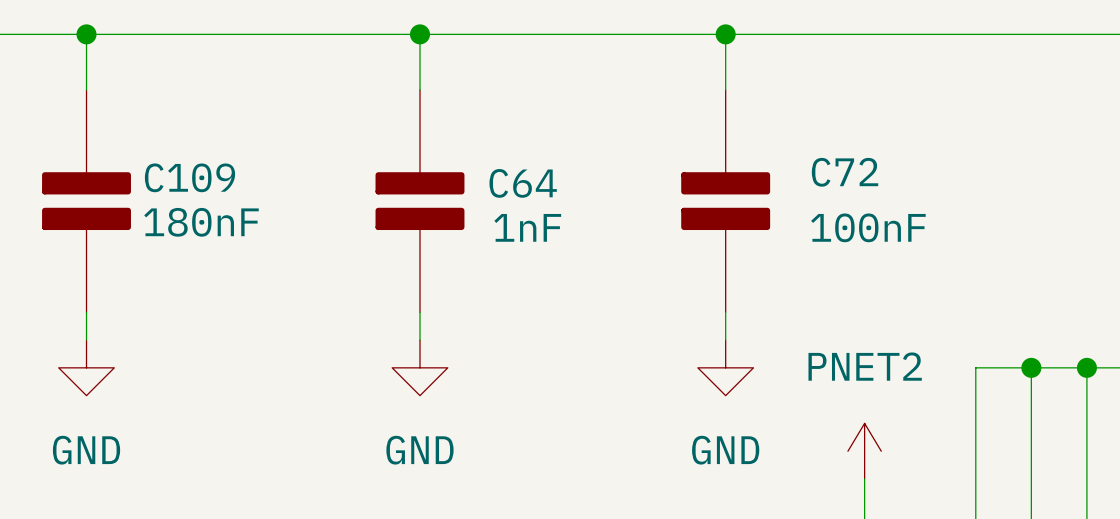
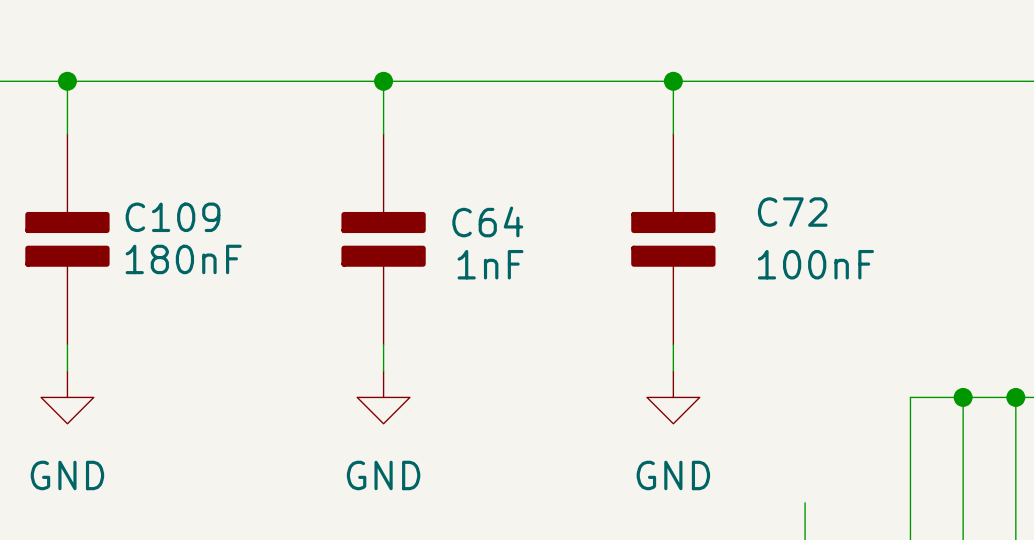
power symbol: PNET2 (864, 451) -> none

